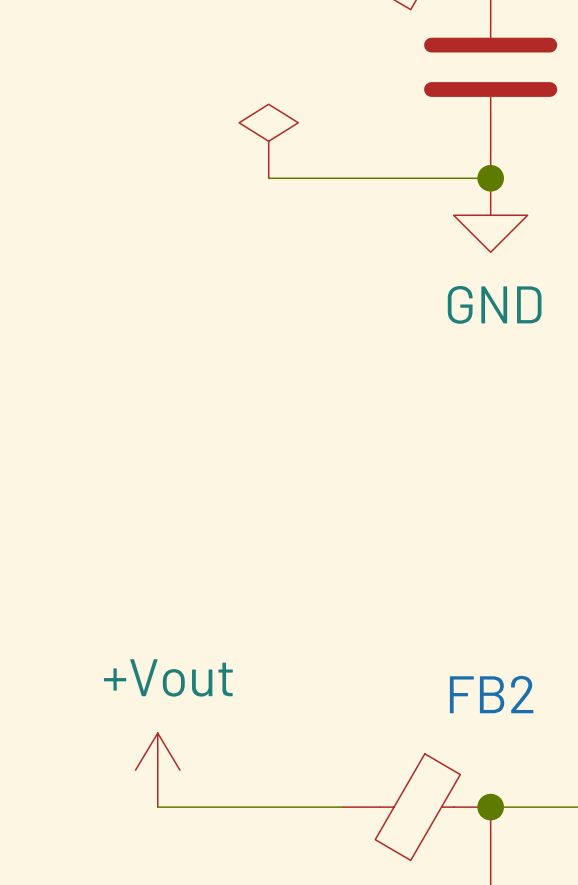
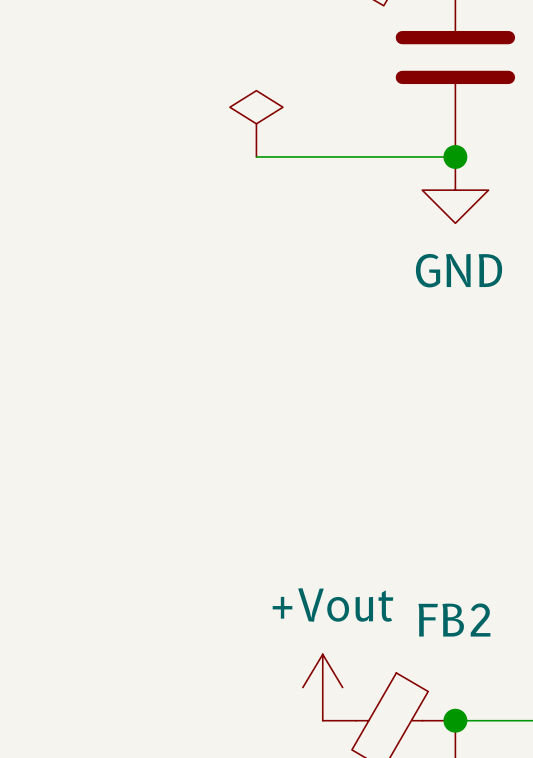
power symbol position: +Vout (157, 770) -> +Vout (322, 687)
wire: (157, 807) (342, 807) -> none

